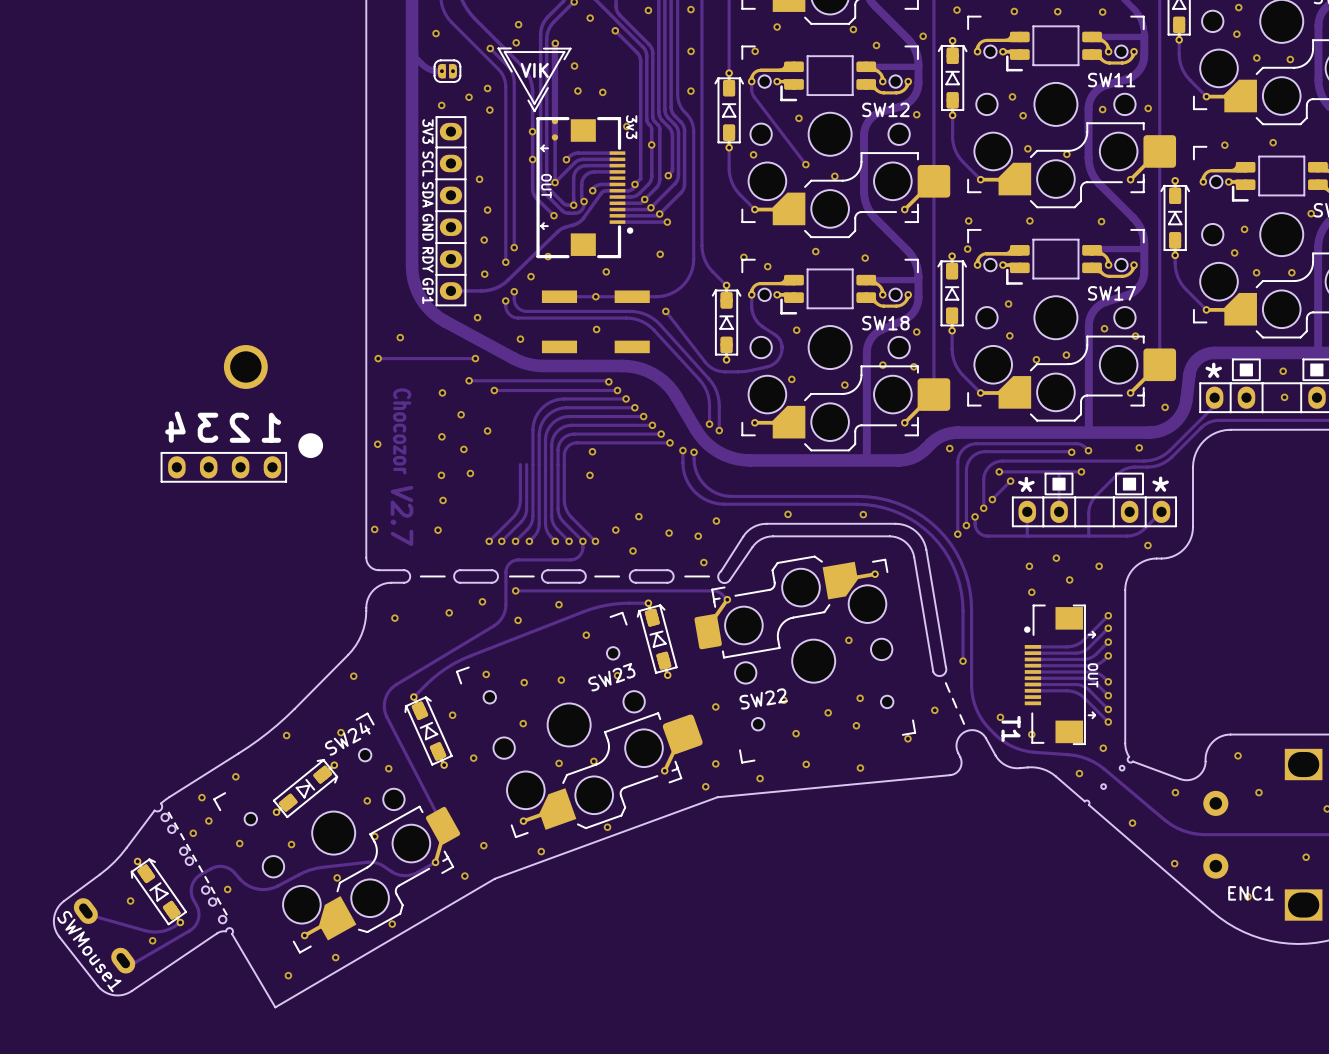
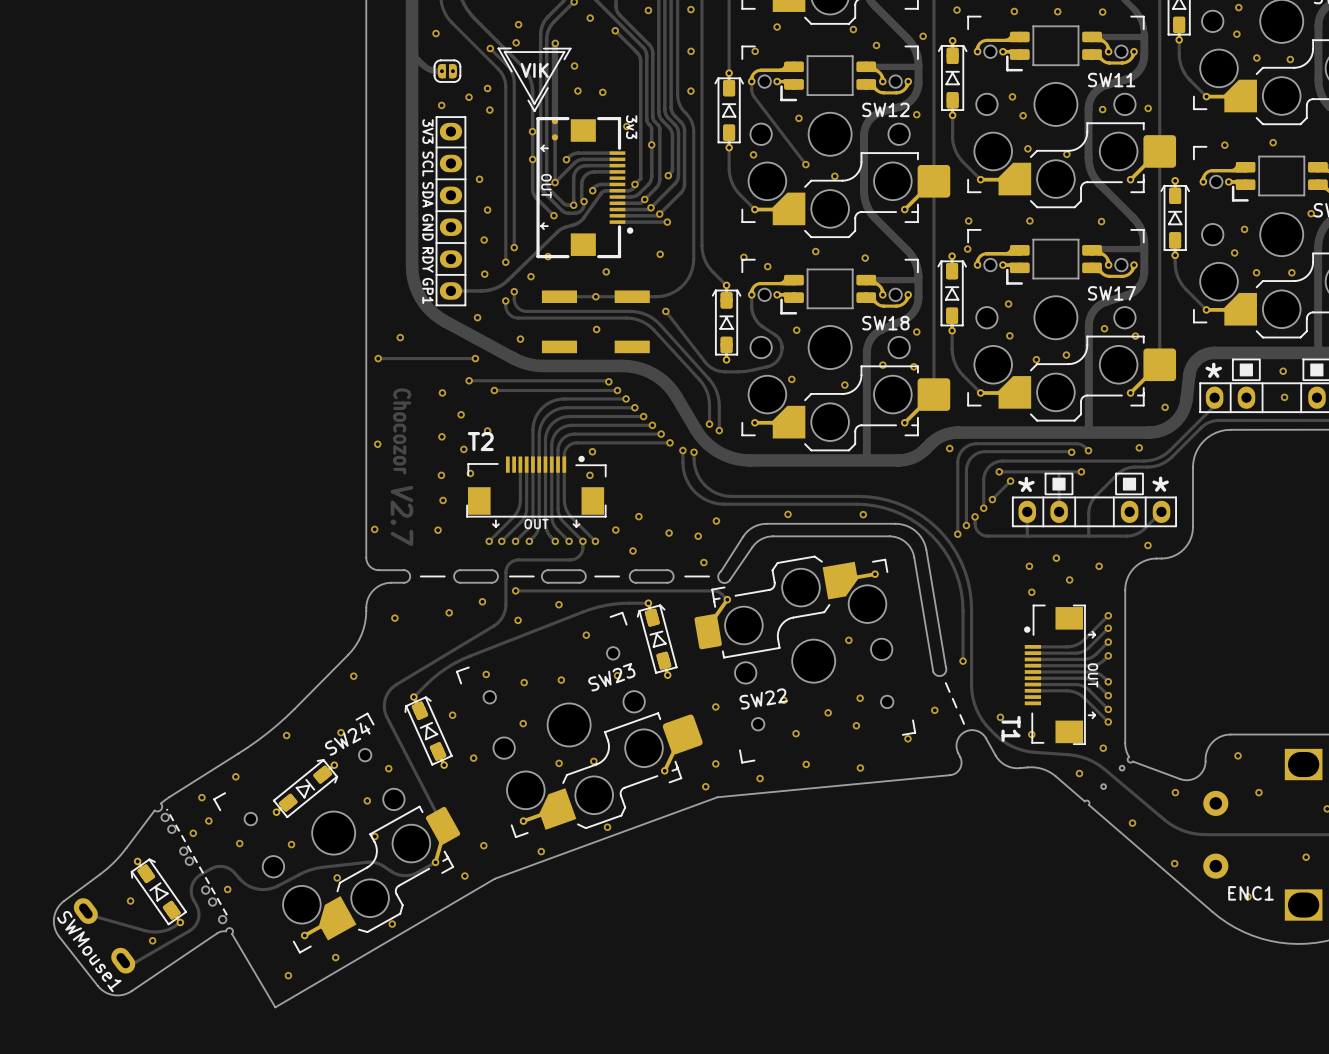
part: (245, 366) -> none
part: (241, 457) -> none
T2: none -> (536, 491)

